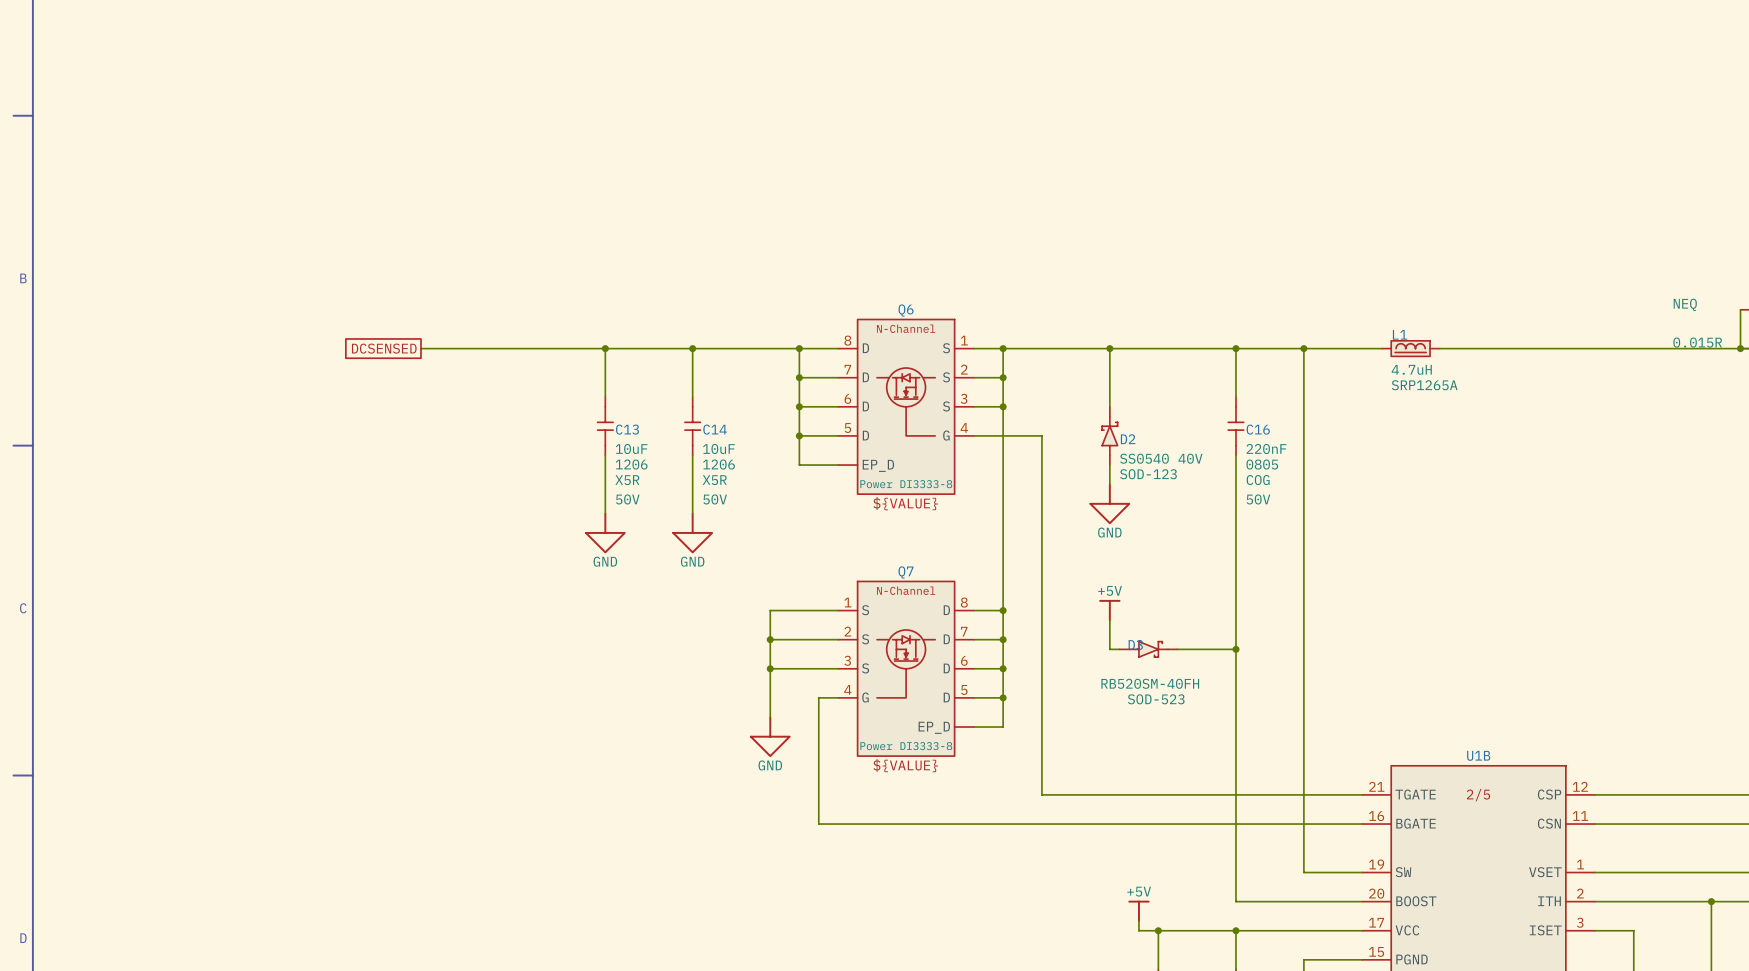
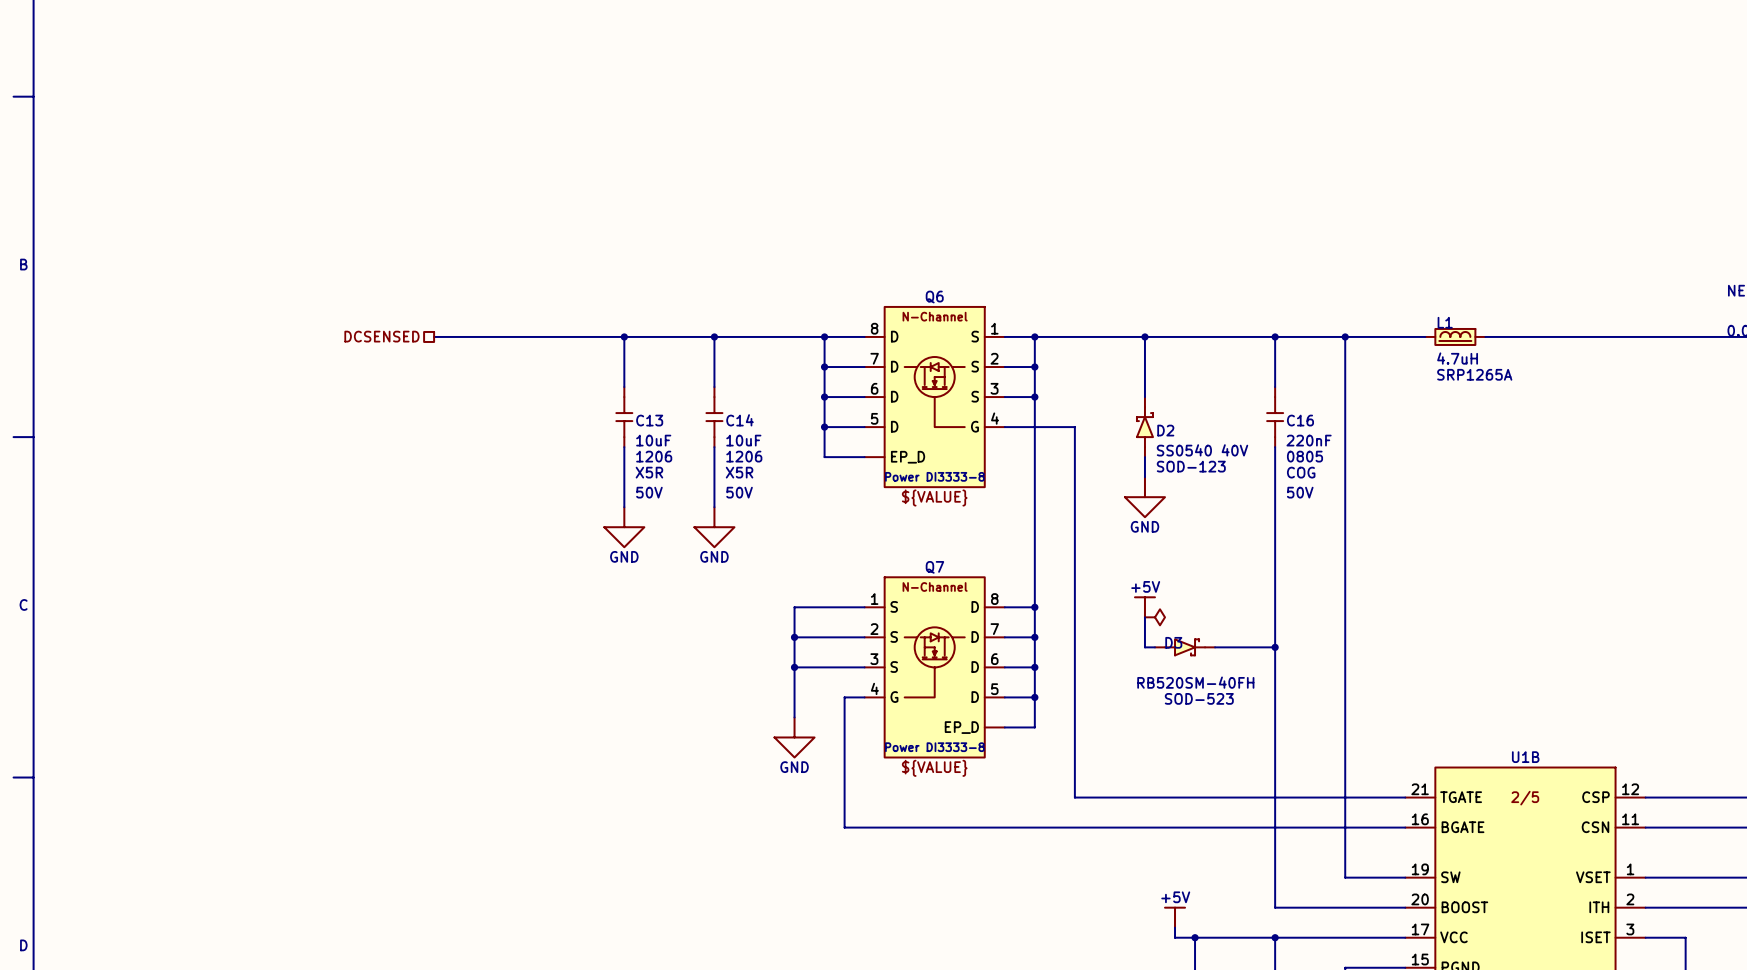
hierarchical label: none -> DCSENSED (381, 336)
global label: DCSENSED (384, 348) -> none
power symbol: none -> (1154, 617)

